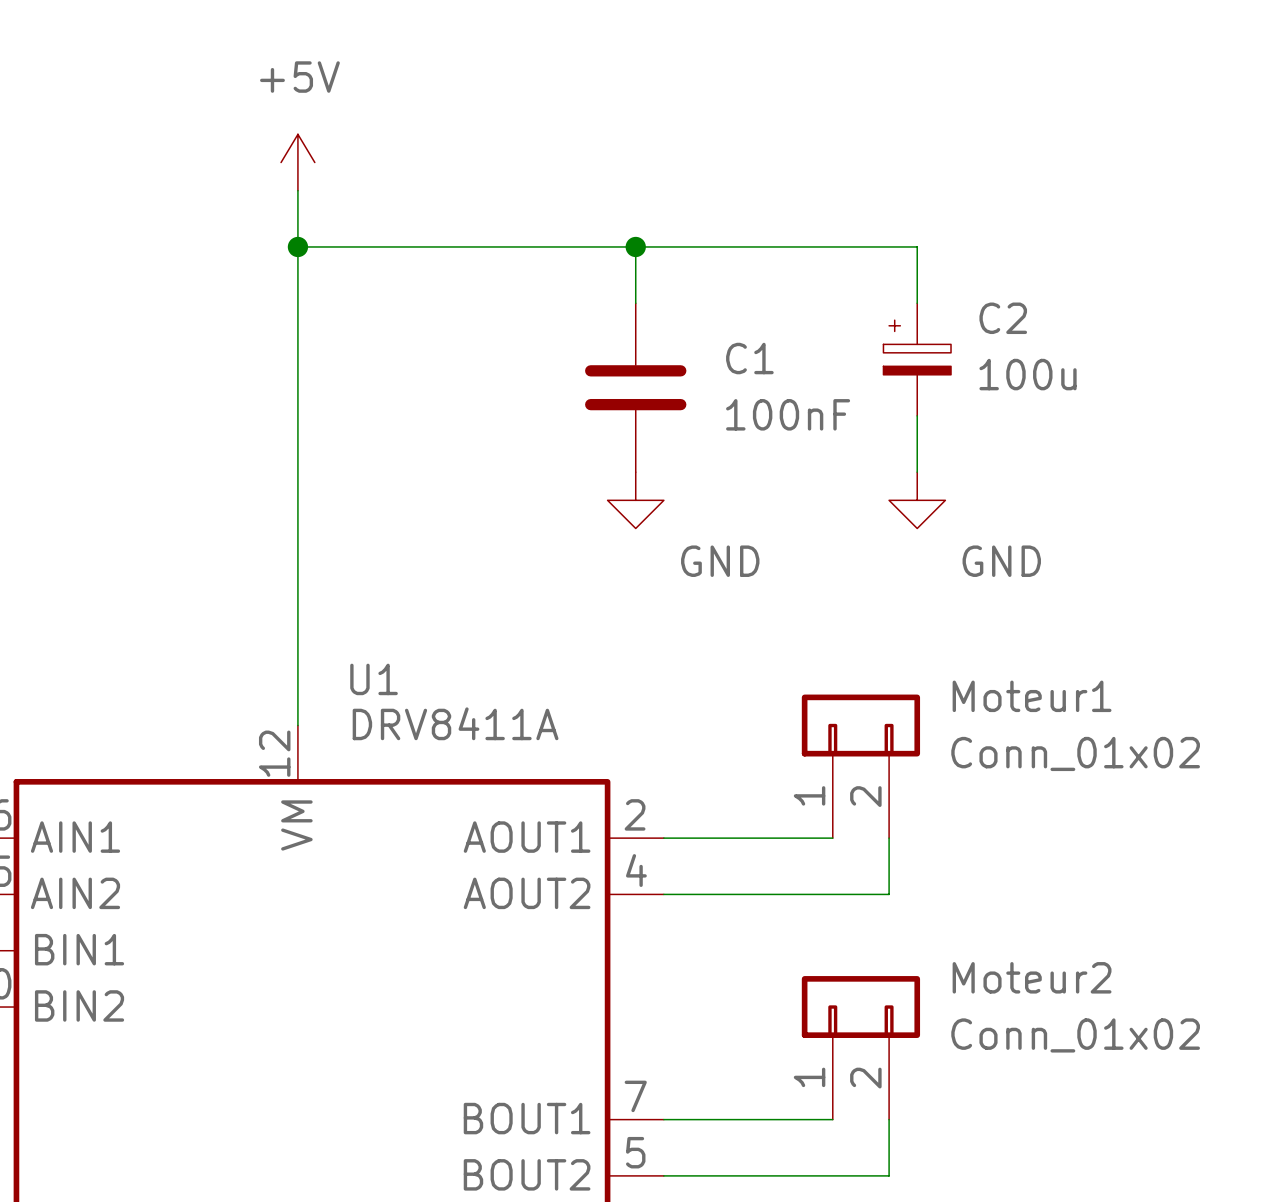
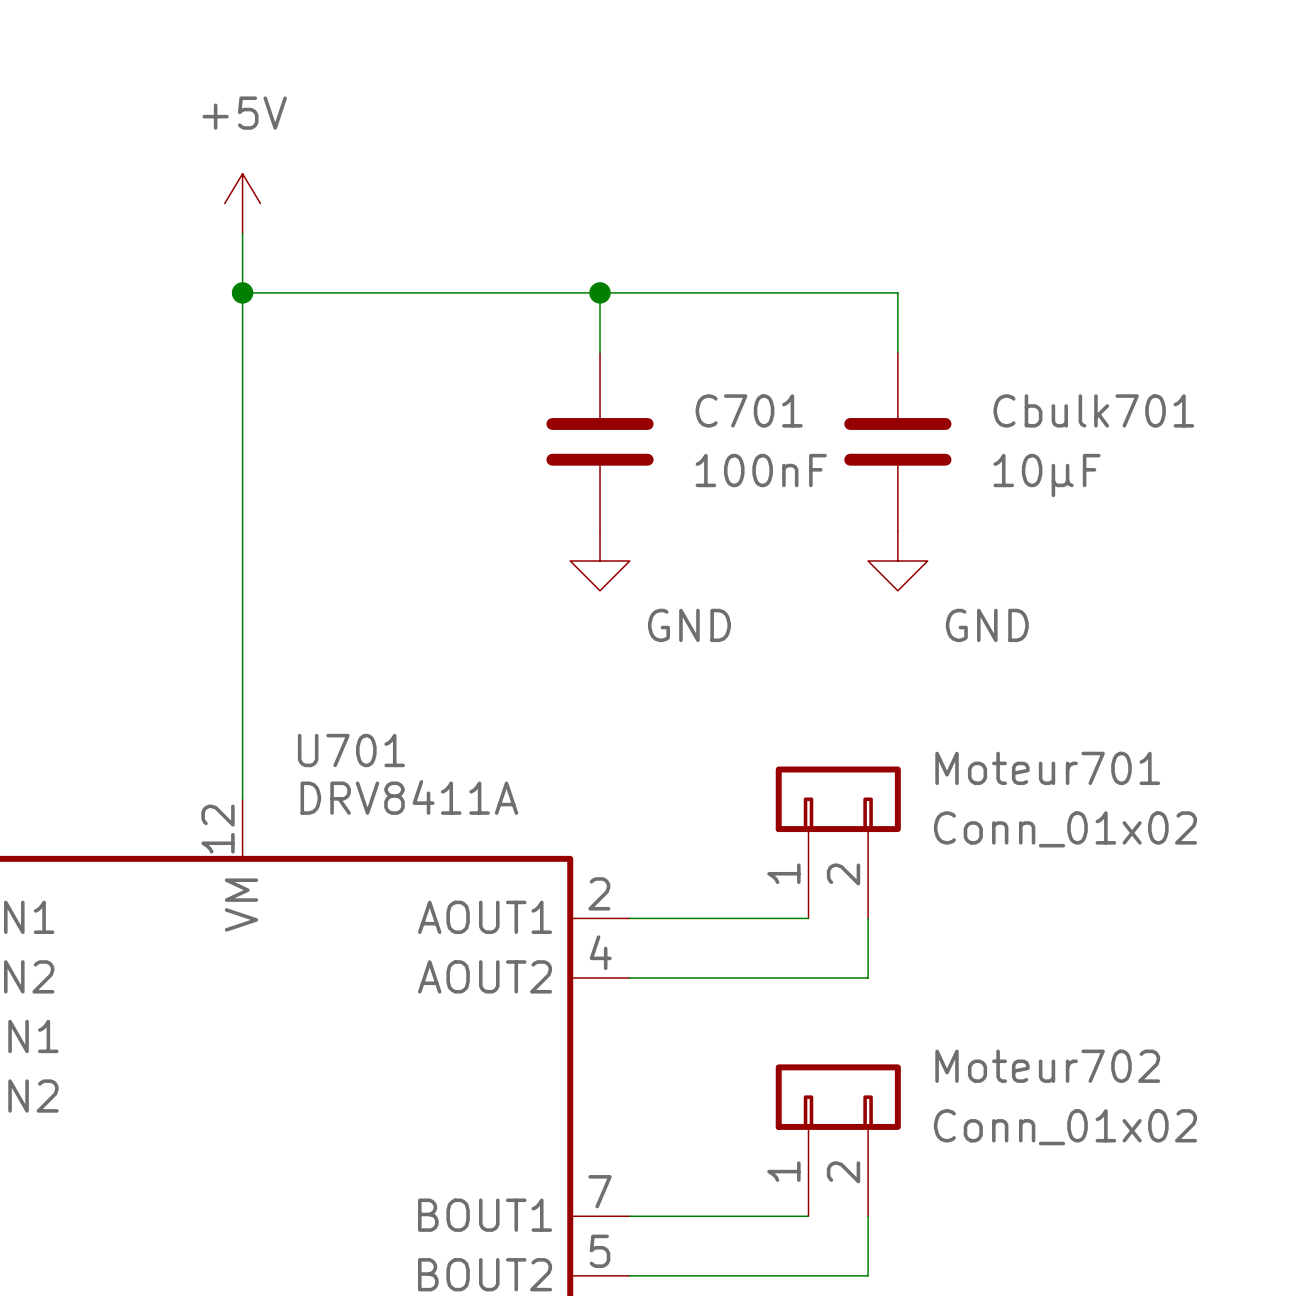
C1 name: C1 (749, 358) -> C701 (749, 410)
C2: 100u (917, 359) -> none
Cbulk701: none -> 10µF (897, 441)
U1 name: U1 (374, 679) -> U701 (351, 750)
Moteur1 name: Moteur1 (1032, 696) -> Moteur701 (1047, 768)
Moteur2 name: Moteur2 (1032, 977) -> Moteur702 (1047, 1066)

